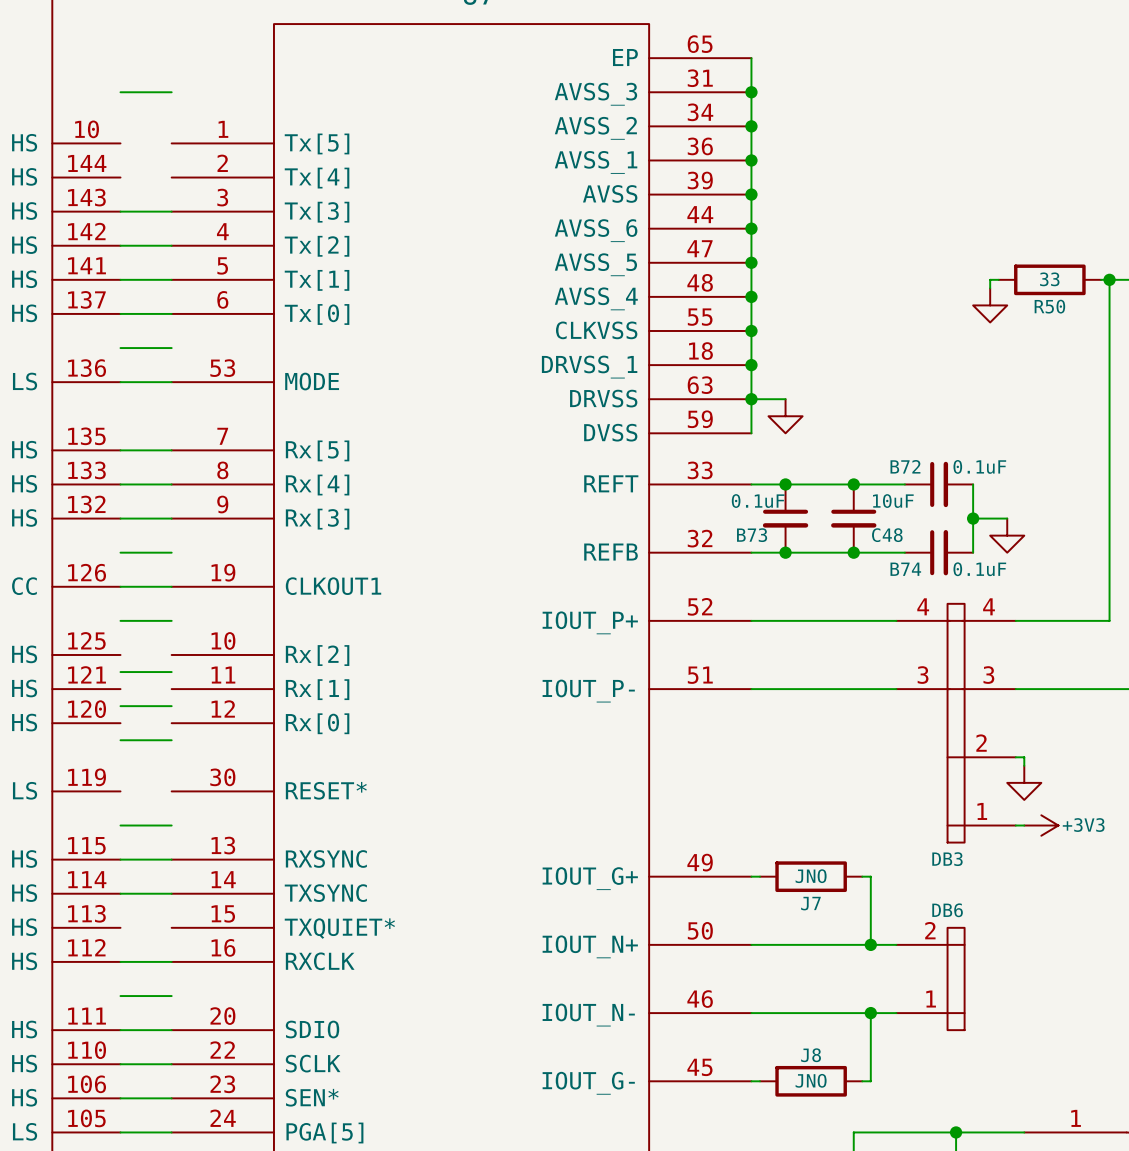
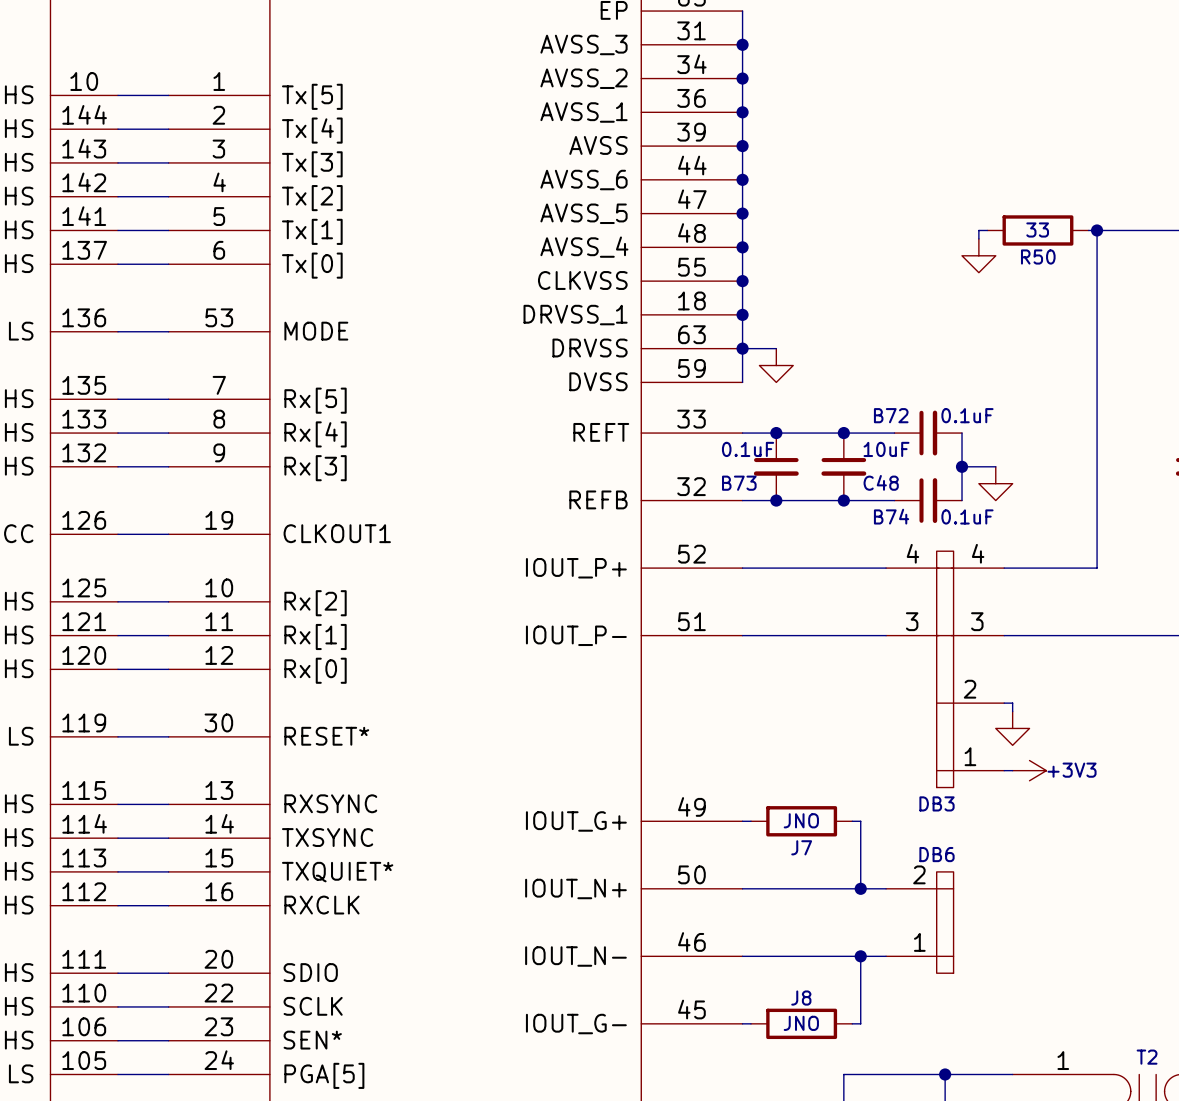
wire: (120, 92) (171, 92) -> (117, 95) (168, 95)
wire: (120, 348) (171, 348) -> (117, 129) (168, 129)
wire: (120, 552) (171, 552) -> none
wire: (120, 620) (171, 620) -> (117, 736) (168, 736)
wire: (120, 672) (171, 672) -> (117, 601) (168, 601)
wire: (120, 706) (171, 706) -> (117, 635) (168, 635)
wire: (120, 740) (171, 740) -> (117, 669) (168, 669)
wire: (120, 825) (171, 825) -> (117, 871) (168, 871)
wire: (120, 996) (171, 996) -> none

